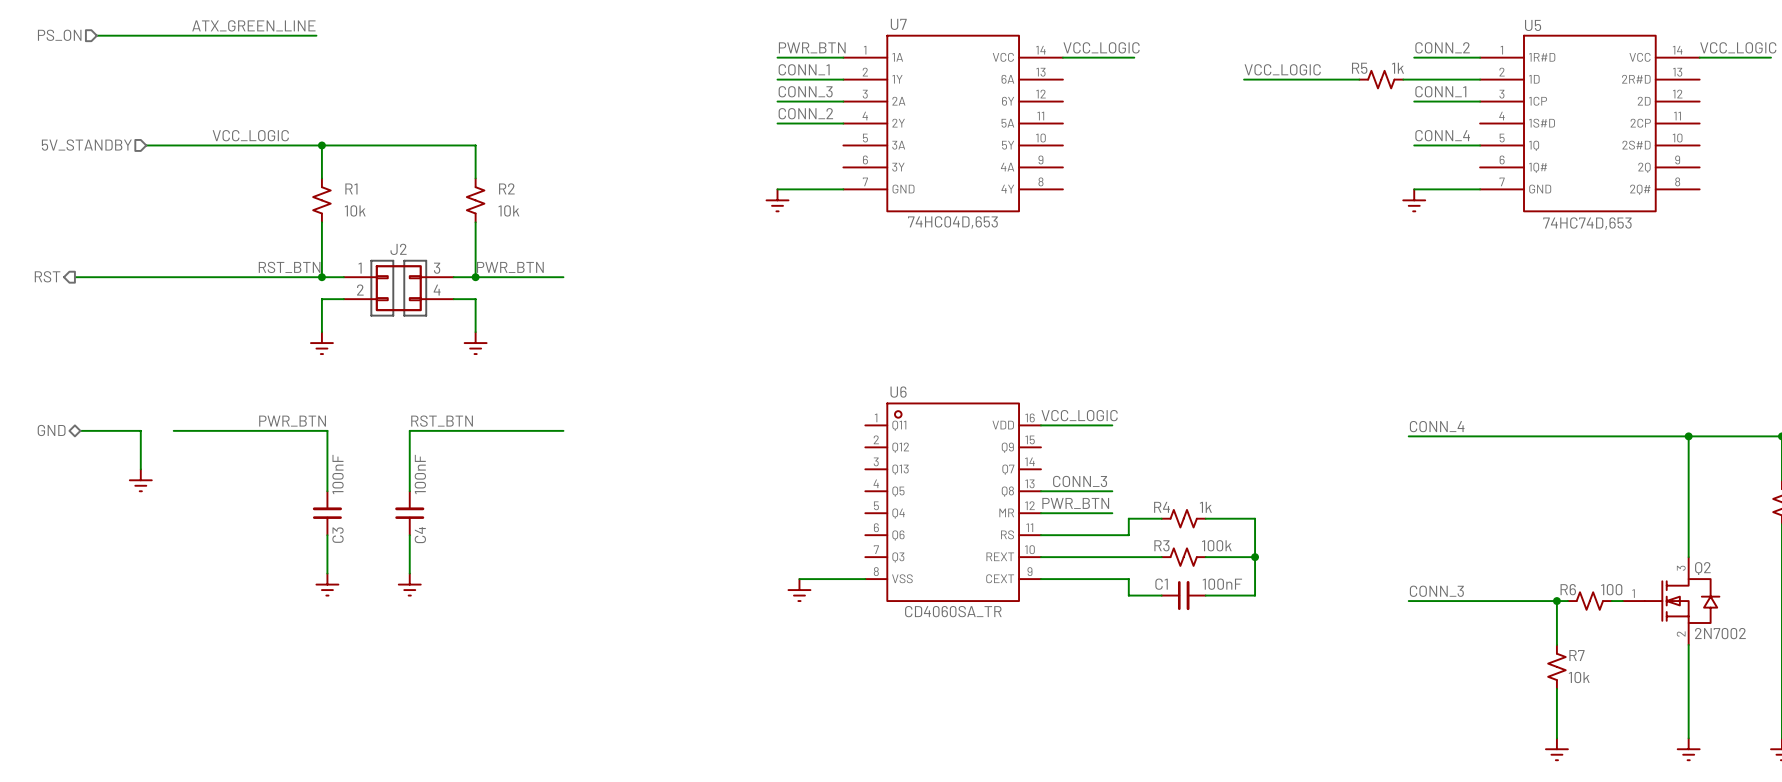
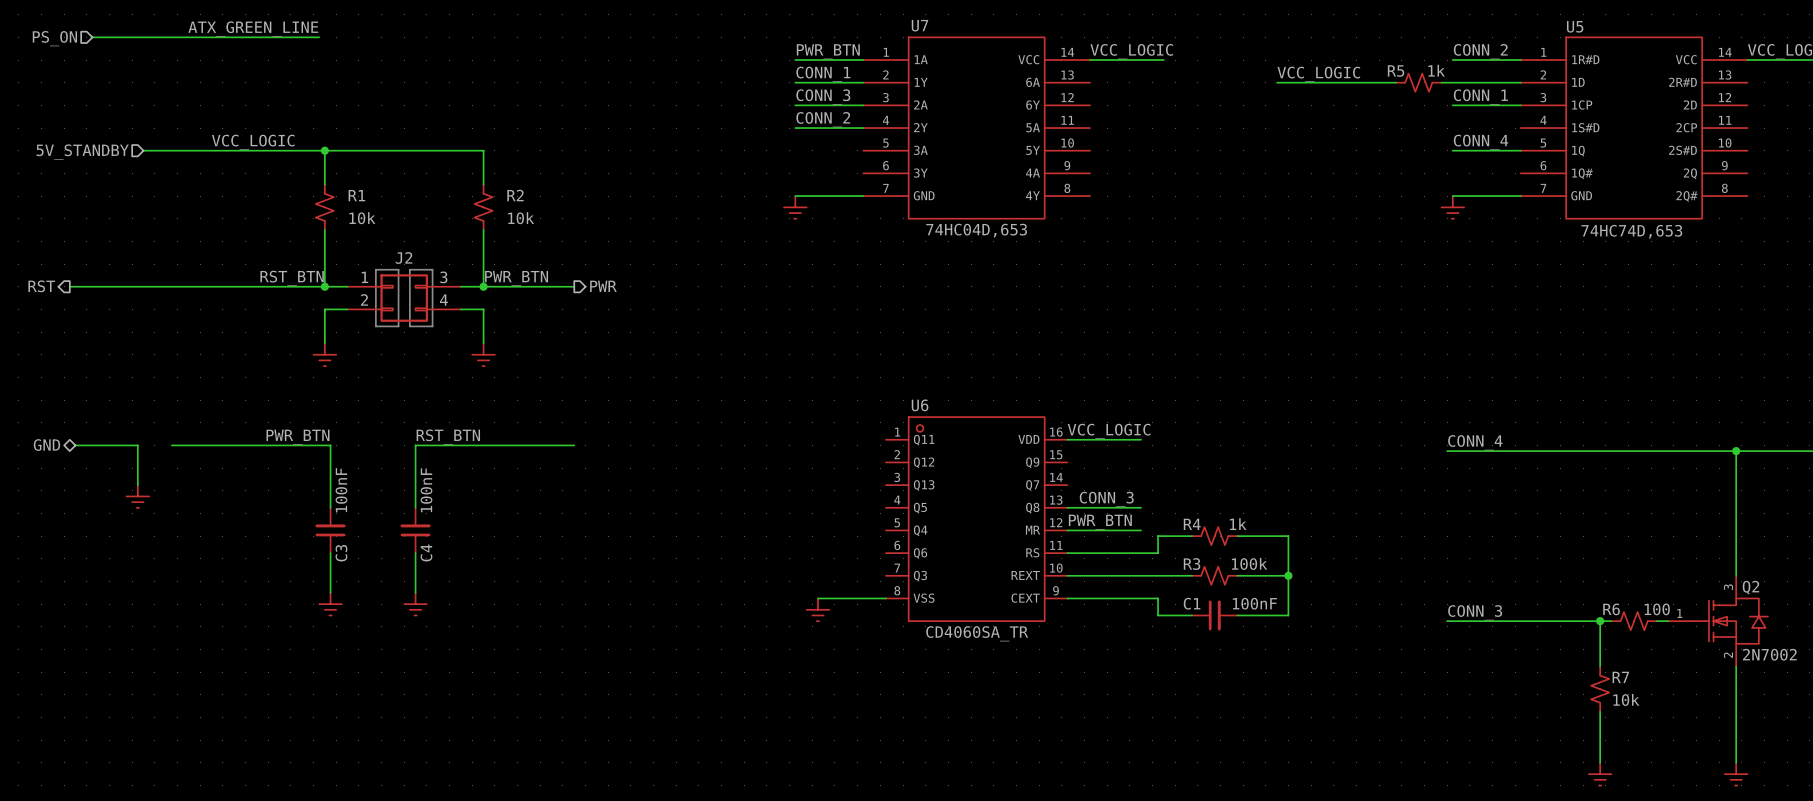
hierarchical label: none -> PWR (603, 286)

